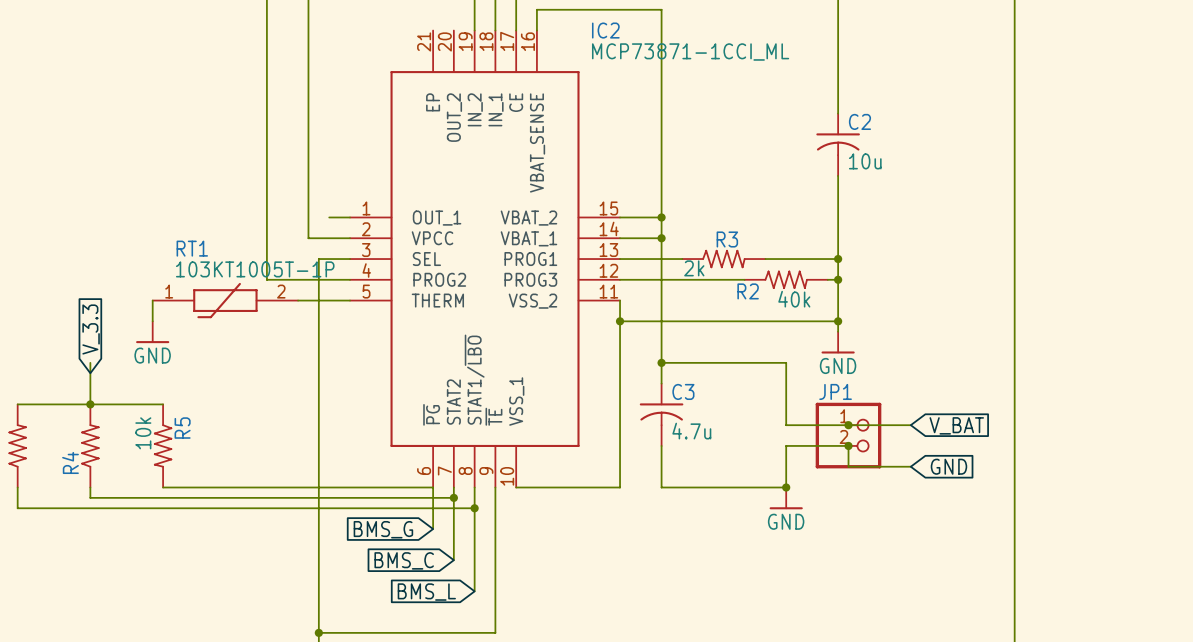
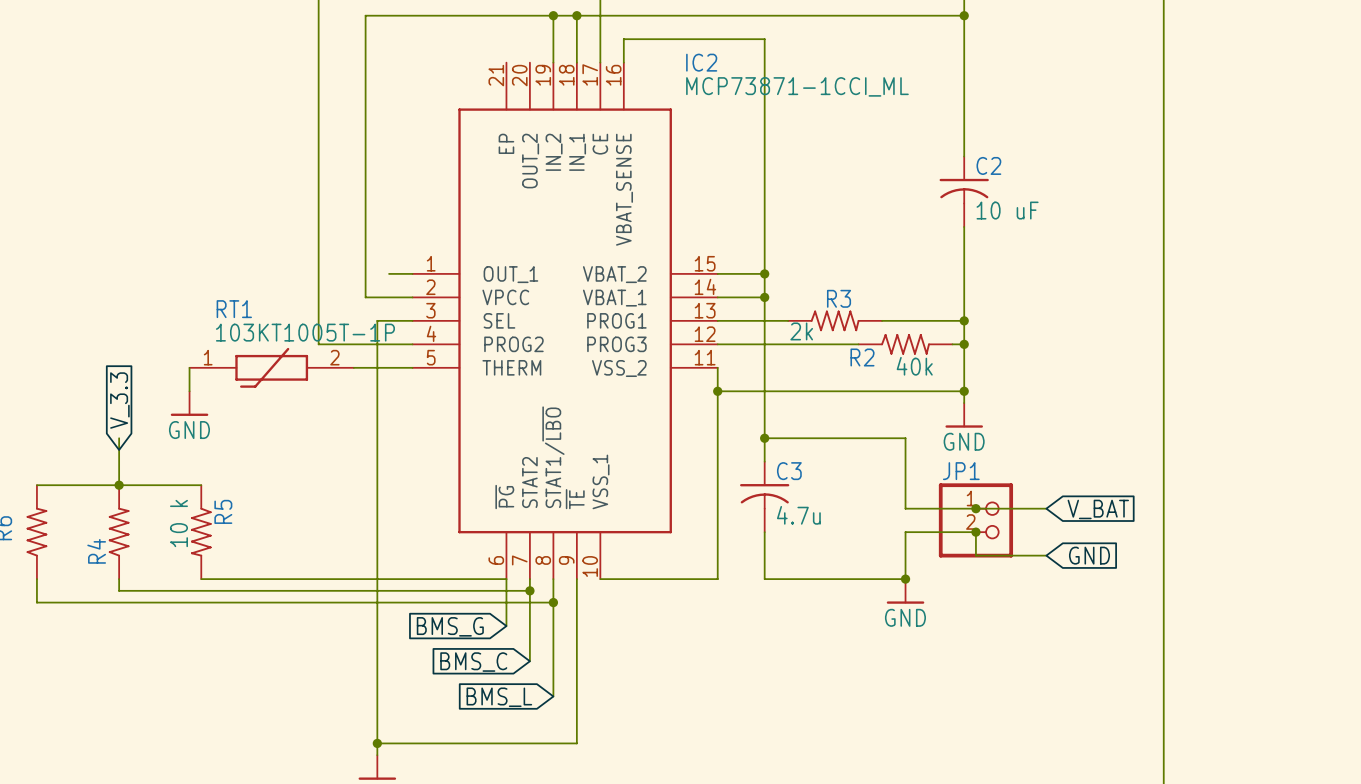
C2 value: 10u (865, 161) -> 10 uF (1007, 210)
R5 value: 10k (143, 433) -> 10 k (178, 523)

